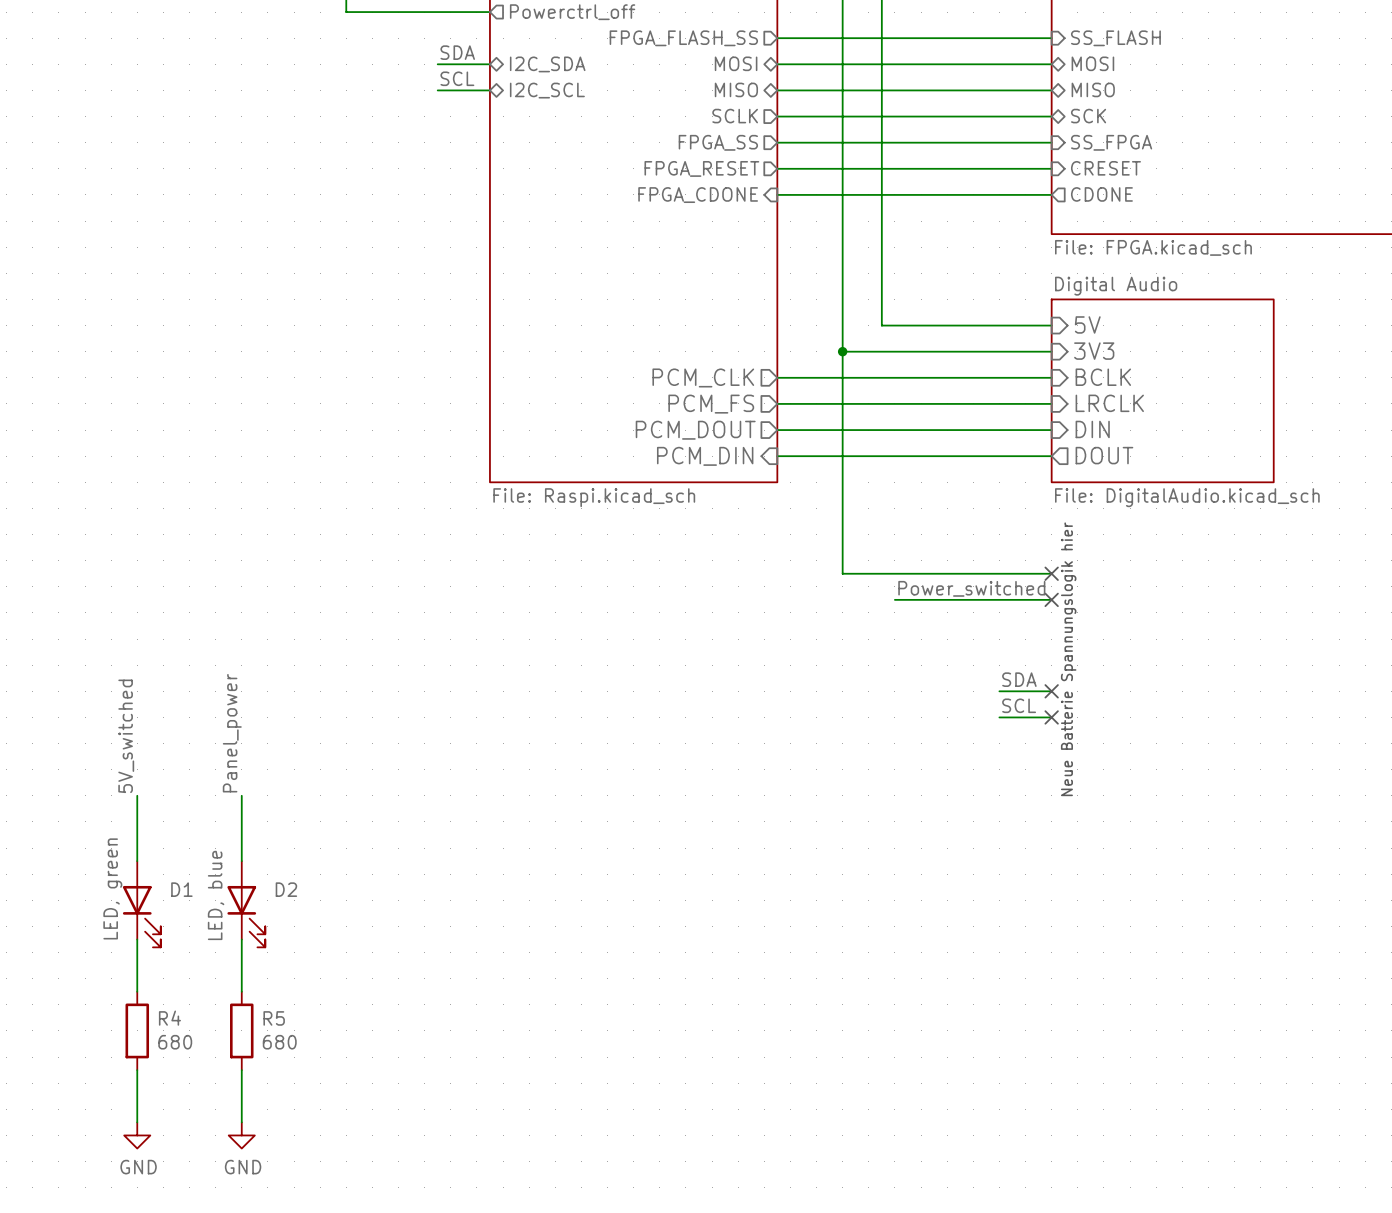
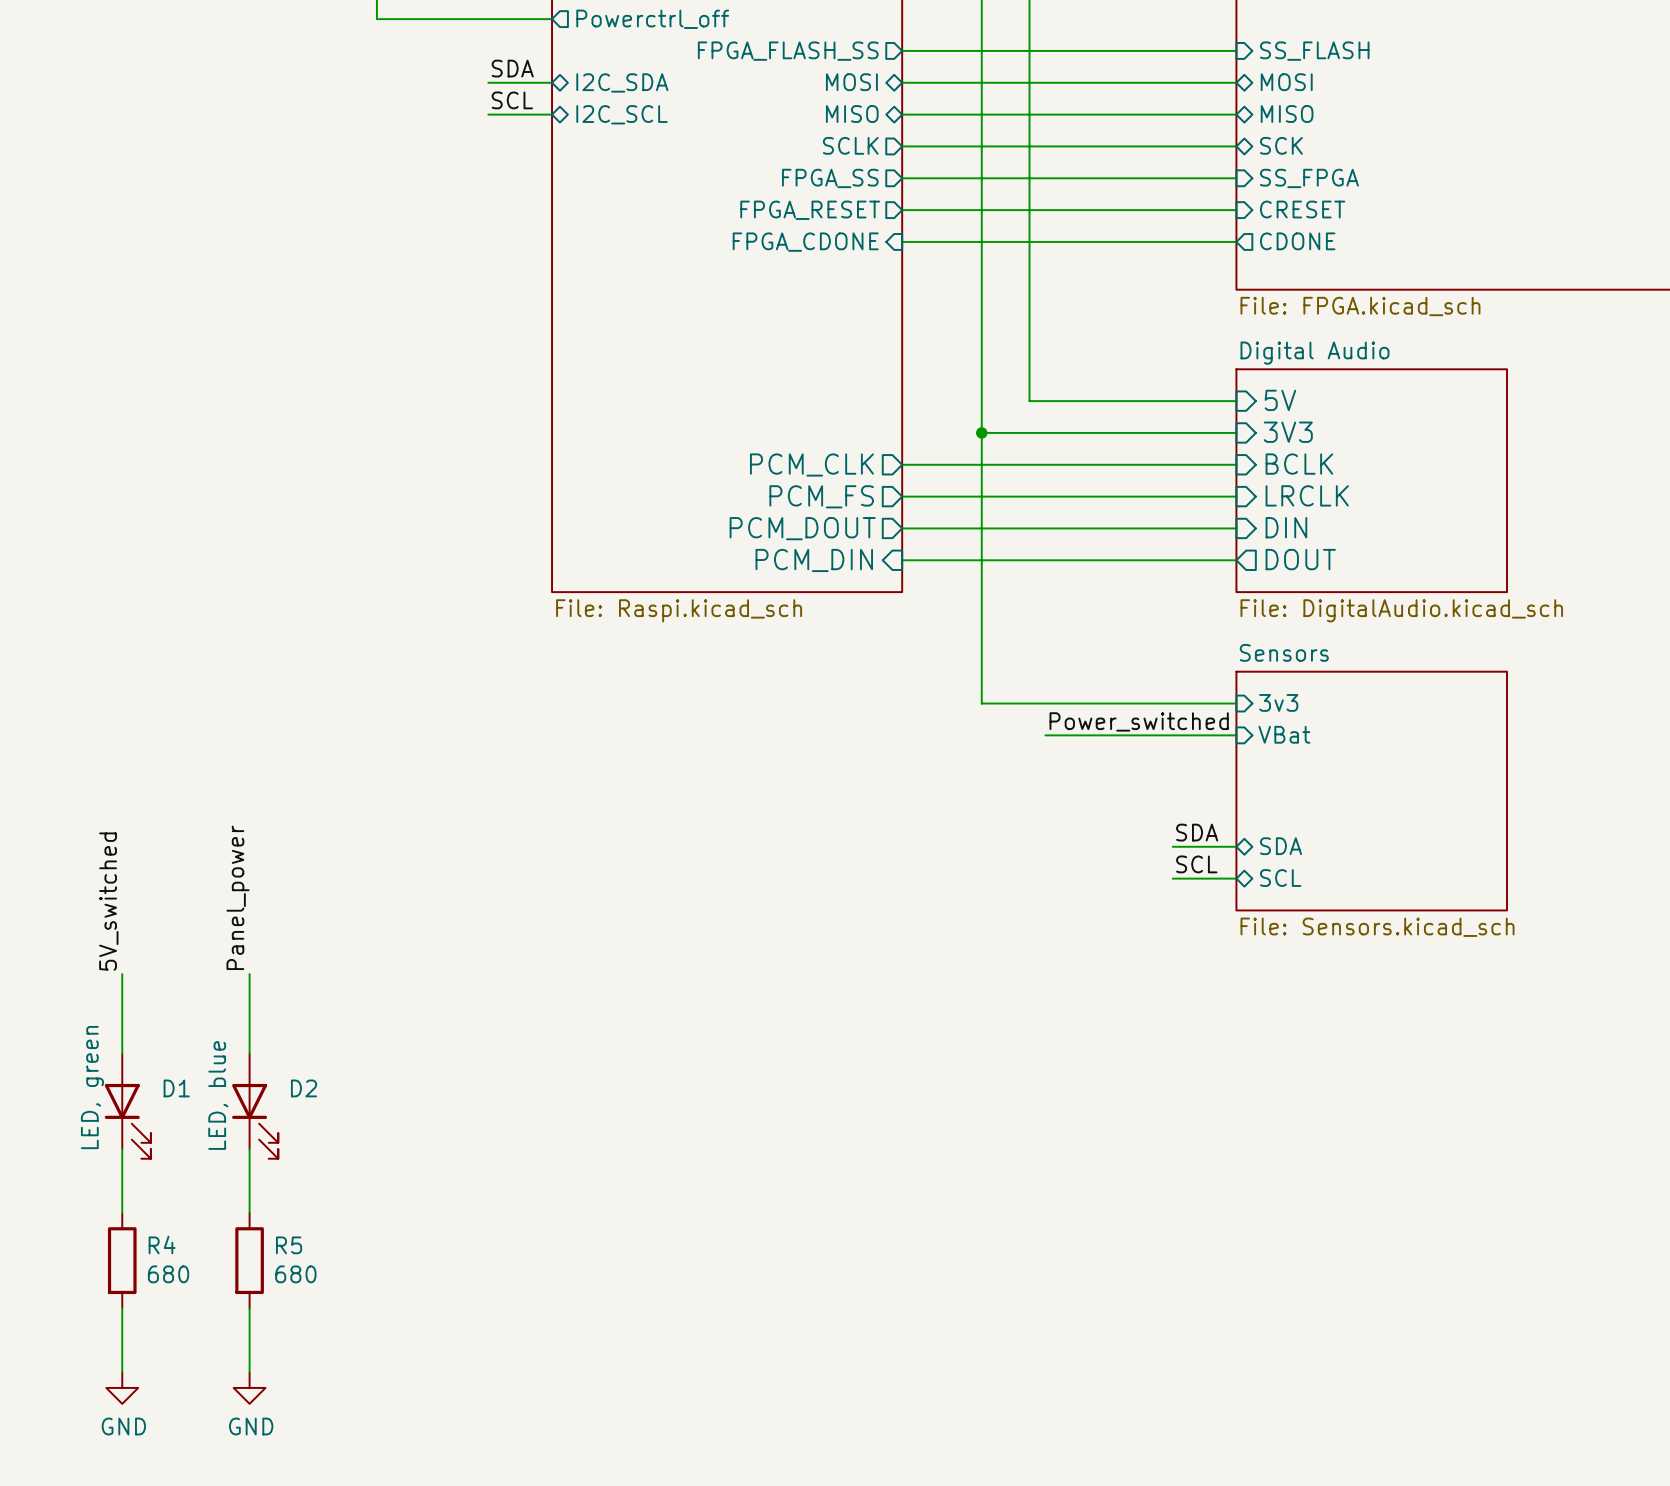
no-connect mark: (1051, 573) -> none
sheet pin: none -> 3v3 (1278, 702)
no-connect mark: (1051, 599) -> none
sheet pin: none -> VBat (1284, 734)
sheet Sensors: none -> File: Sensors.kicad_sch (1371, 791)
text: Neue Batterie Spannungslogik hier (1068, 659) -> none
sheet pin: none -> SDA (1281, 846)
no-connect mark: (1051, 691) -> none
sheet pin: none -> SCL (1280, 878)
no-connect mark: (1051, 717) -> none

